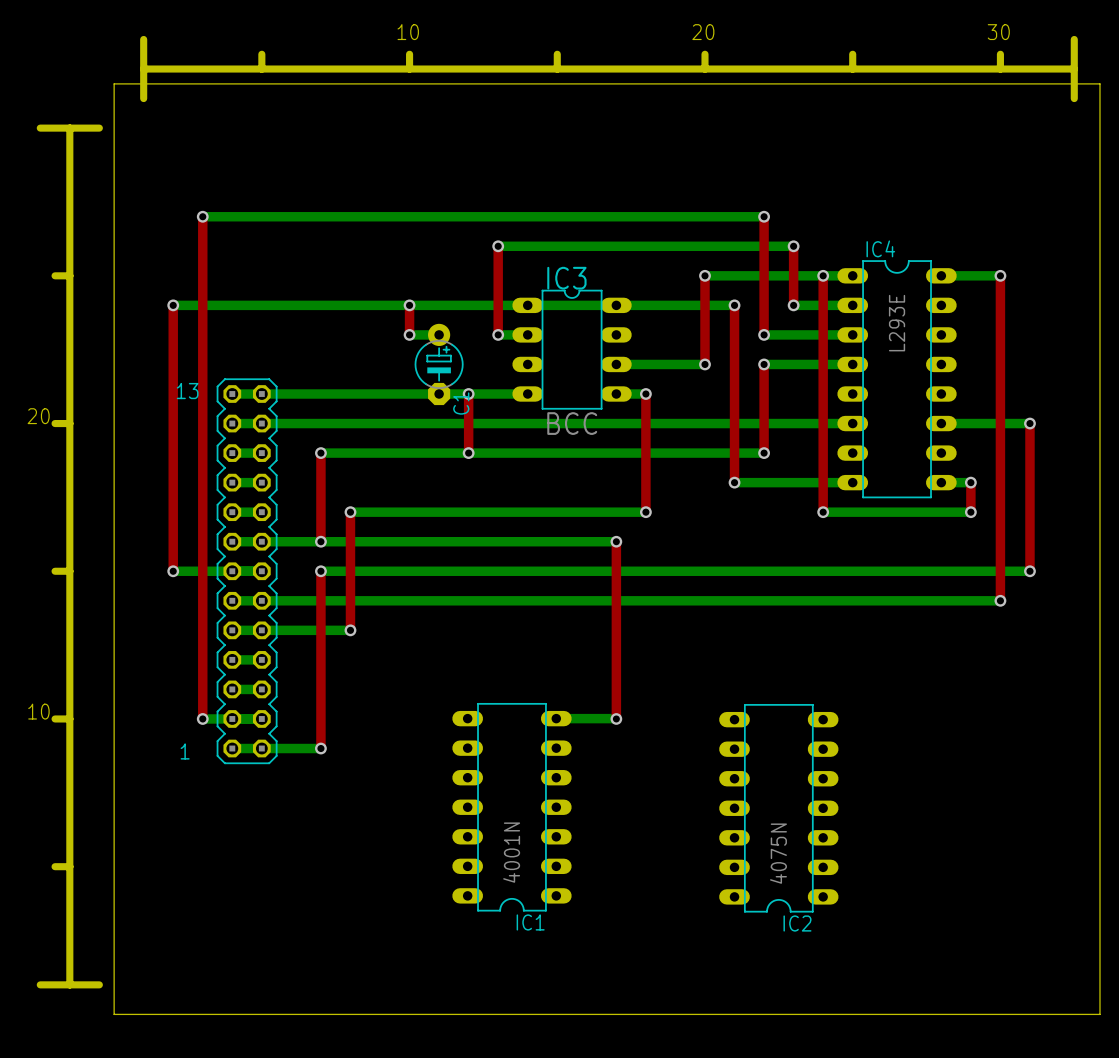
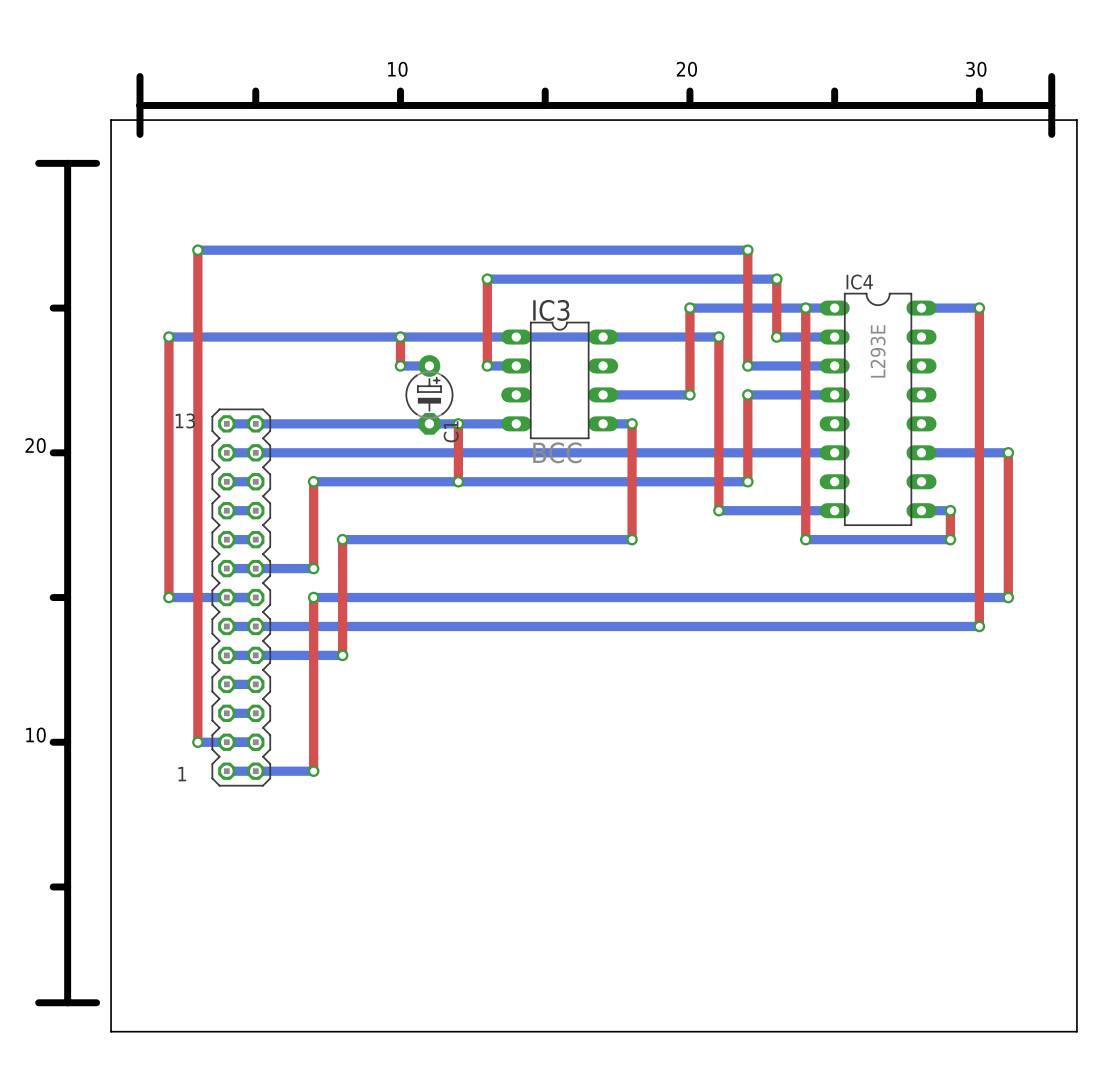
bottom track: (616, 541) (320, 541) (552, 541) (552, 543) -> none
top track: (616, 541) (616, 718) -> none
via: (616, 541) -> none
bottom track: (556, 718) (616, 718) -> none
via: (616, 718) -> none
IC1: 4001N (511, 807) -> none
IC2: 4075N (778, 808) -> none

